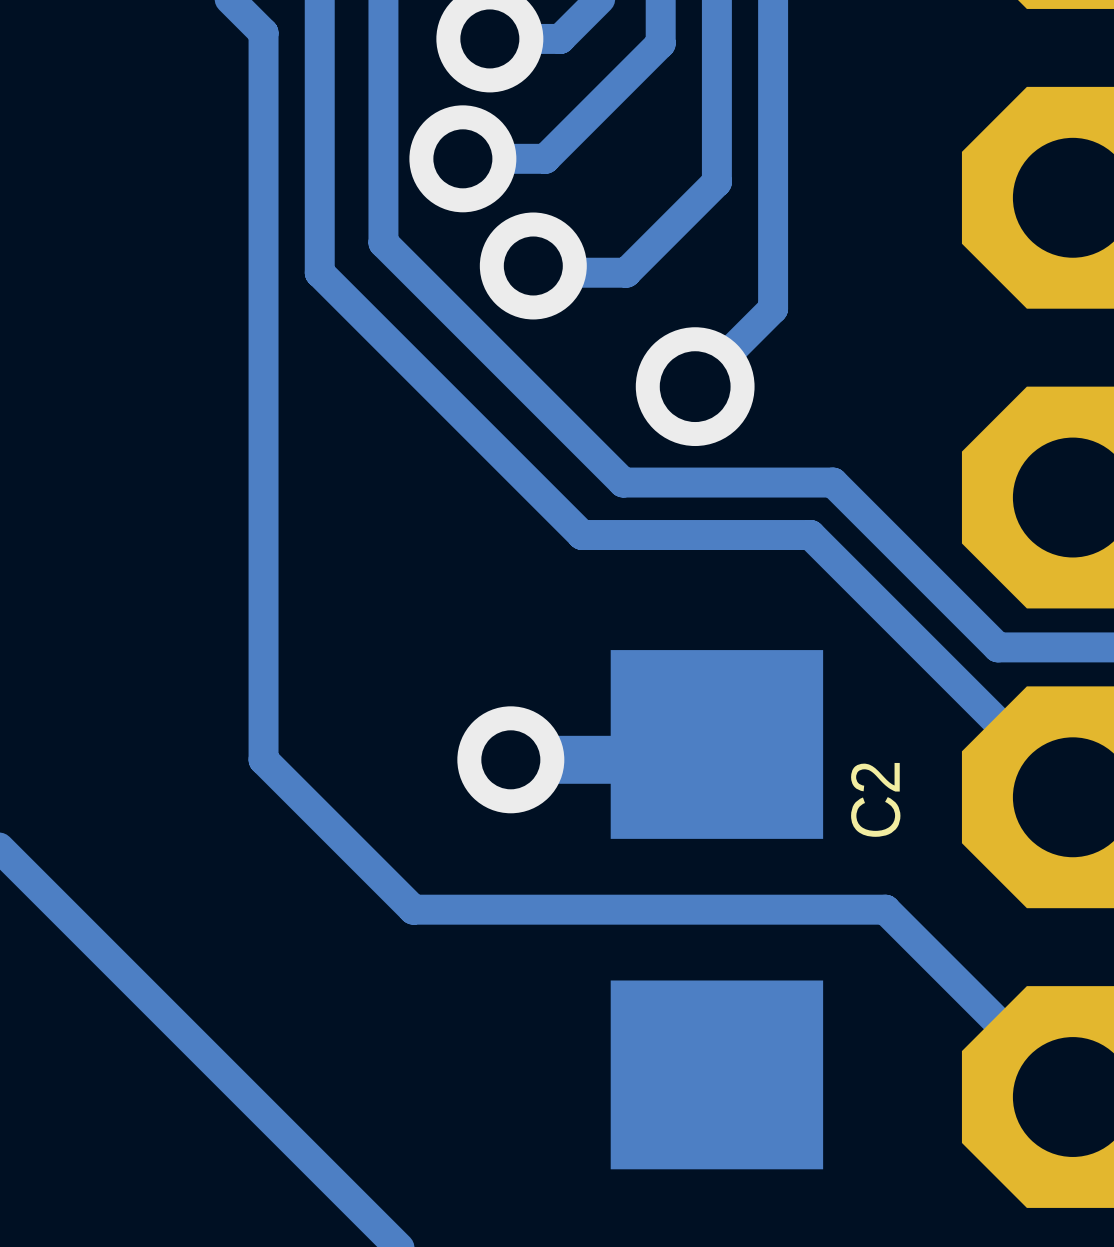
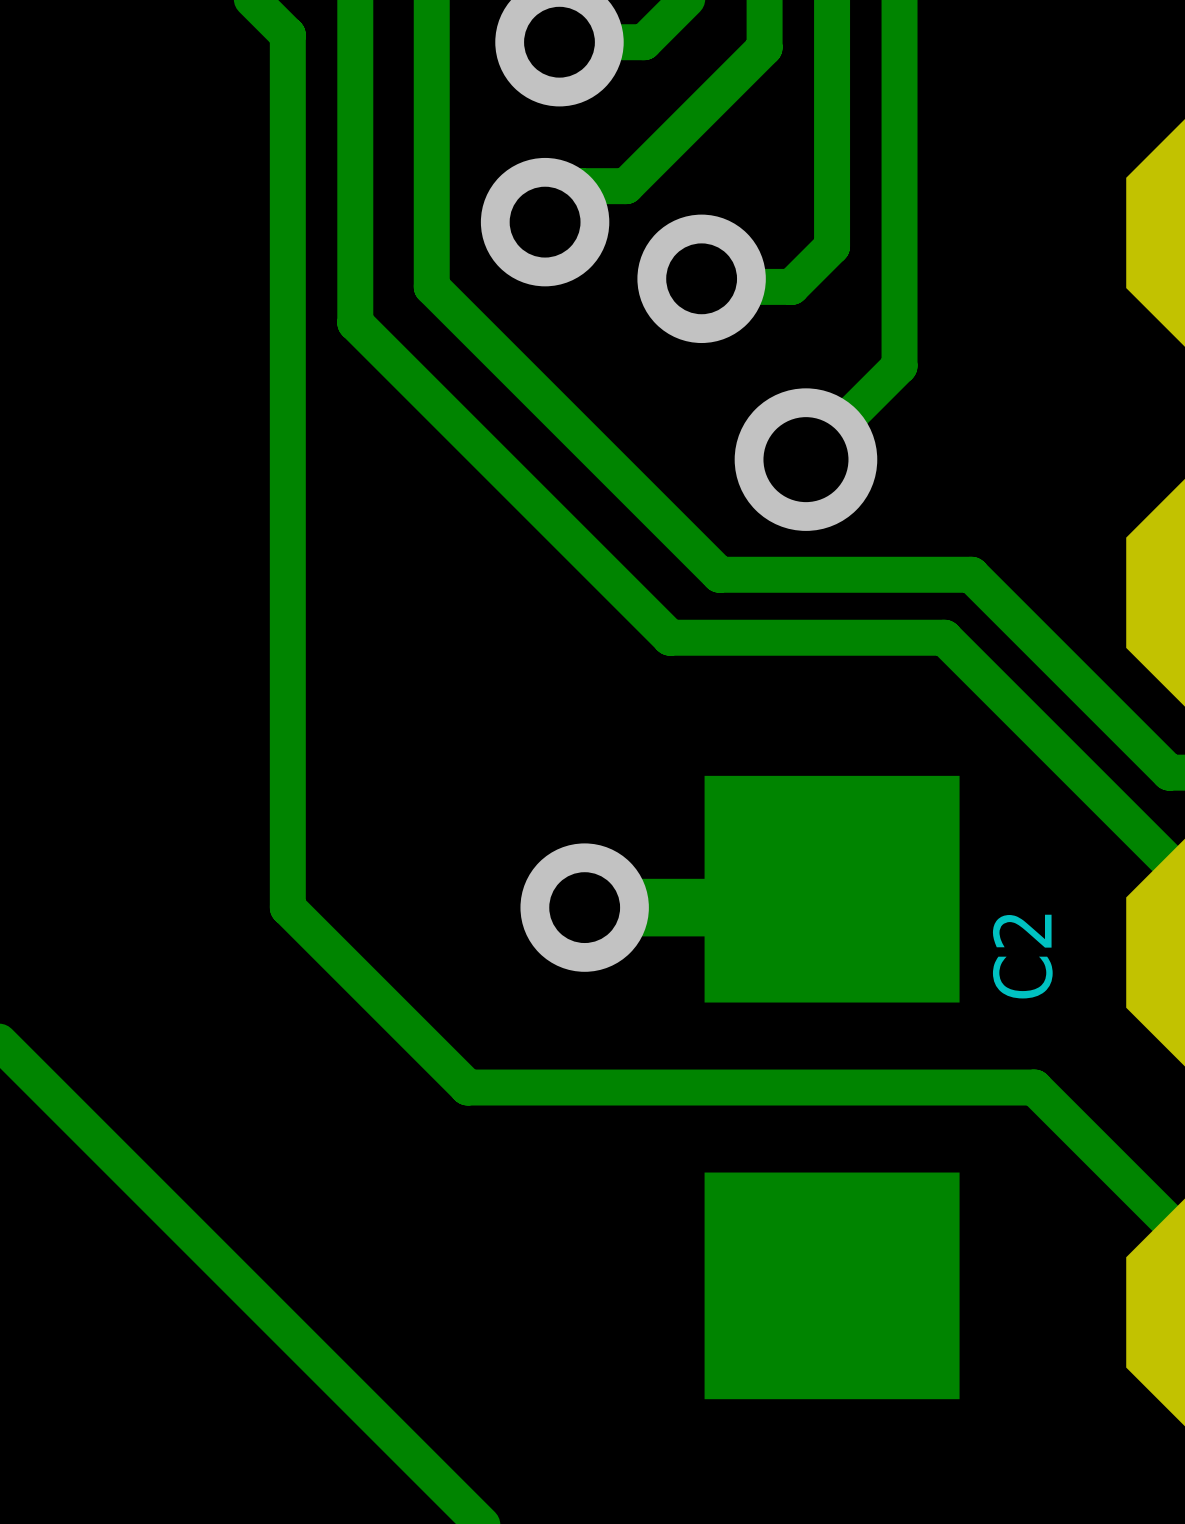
via position: (462, 158) -> (545, 222)
track: (716, 182) (626, 272) (540, 272) (533, 265) -> (832, 214) (832, 246) (791, 286) (709, 286) (701, 278)
via position: (533, 265) -> (701, 278)

